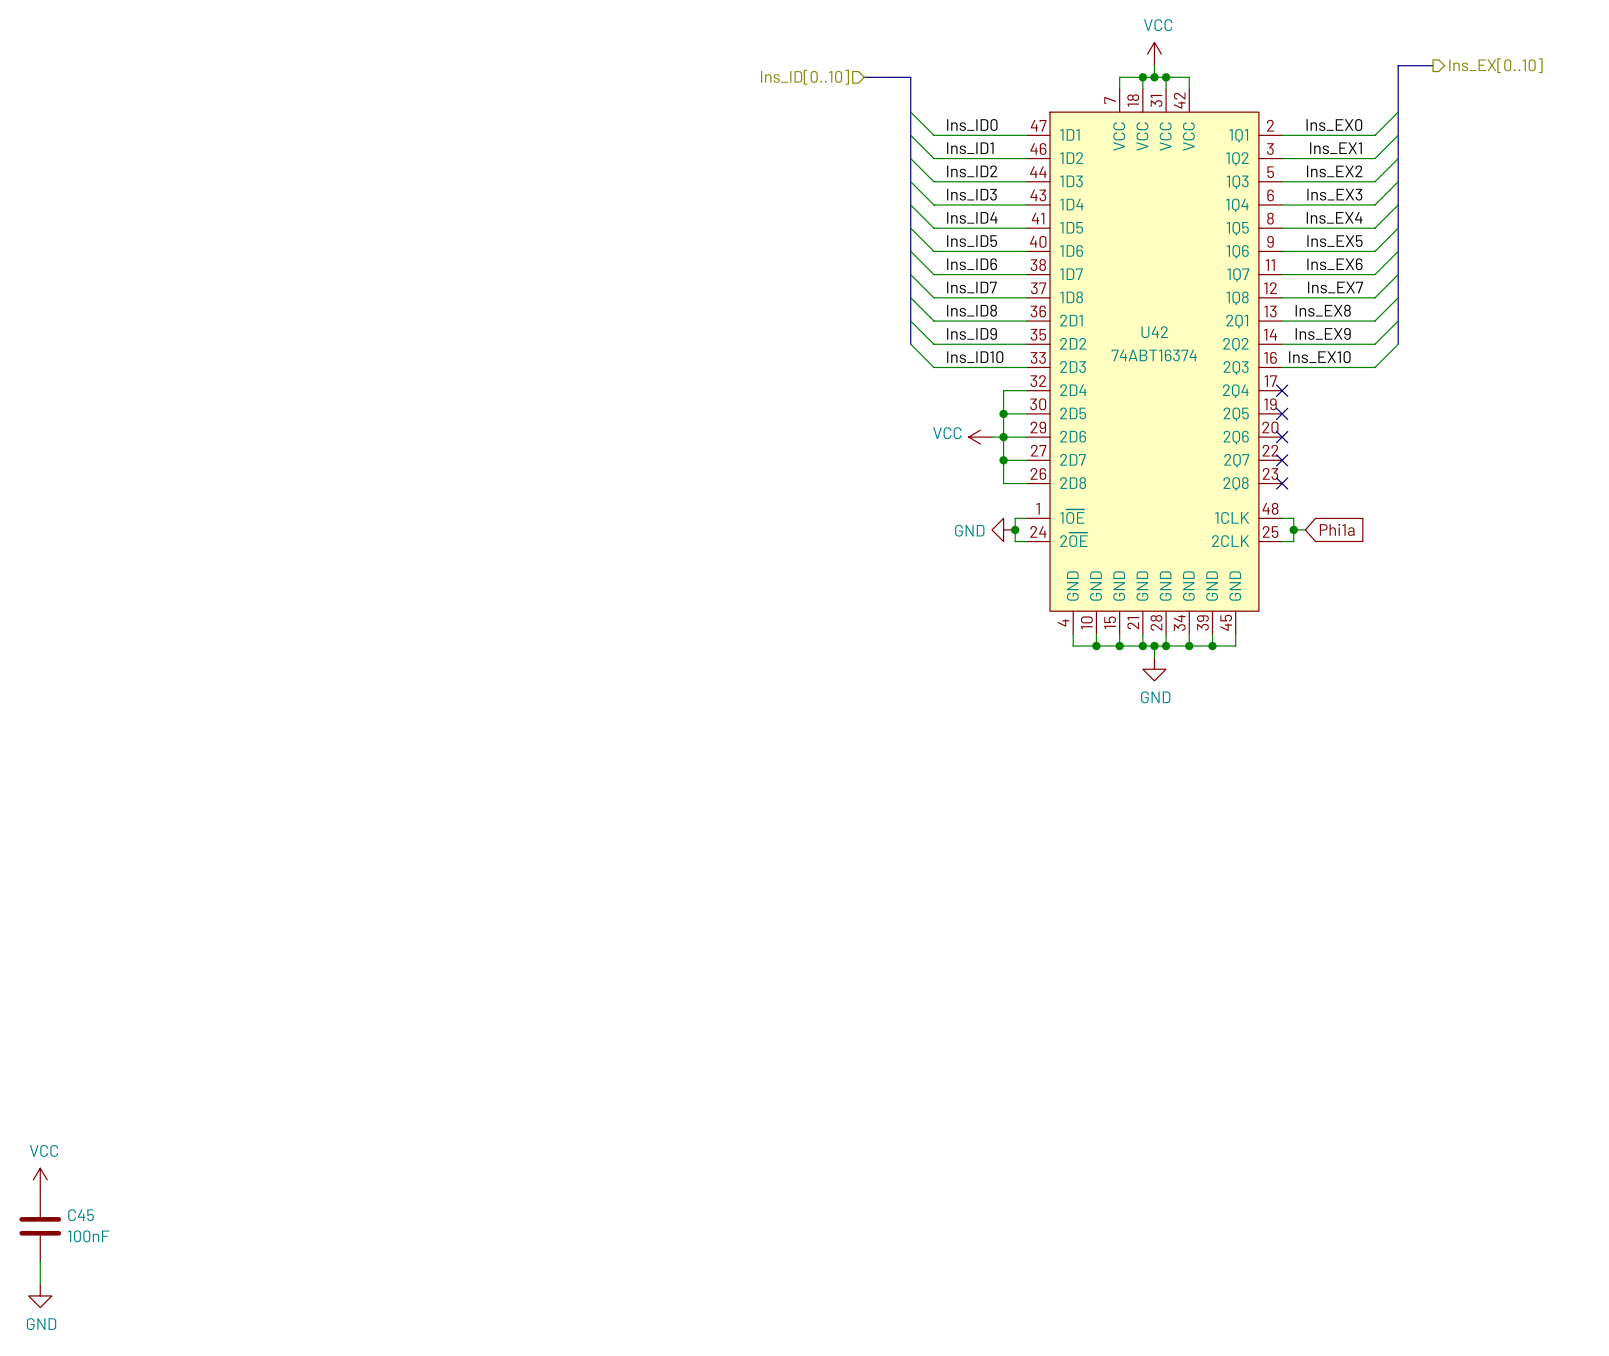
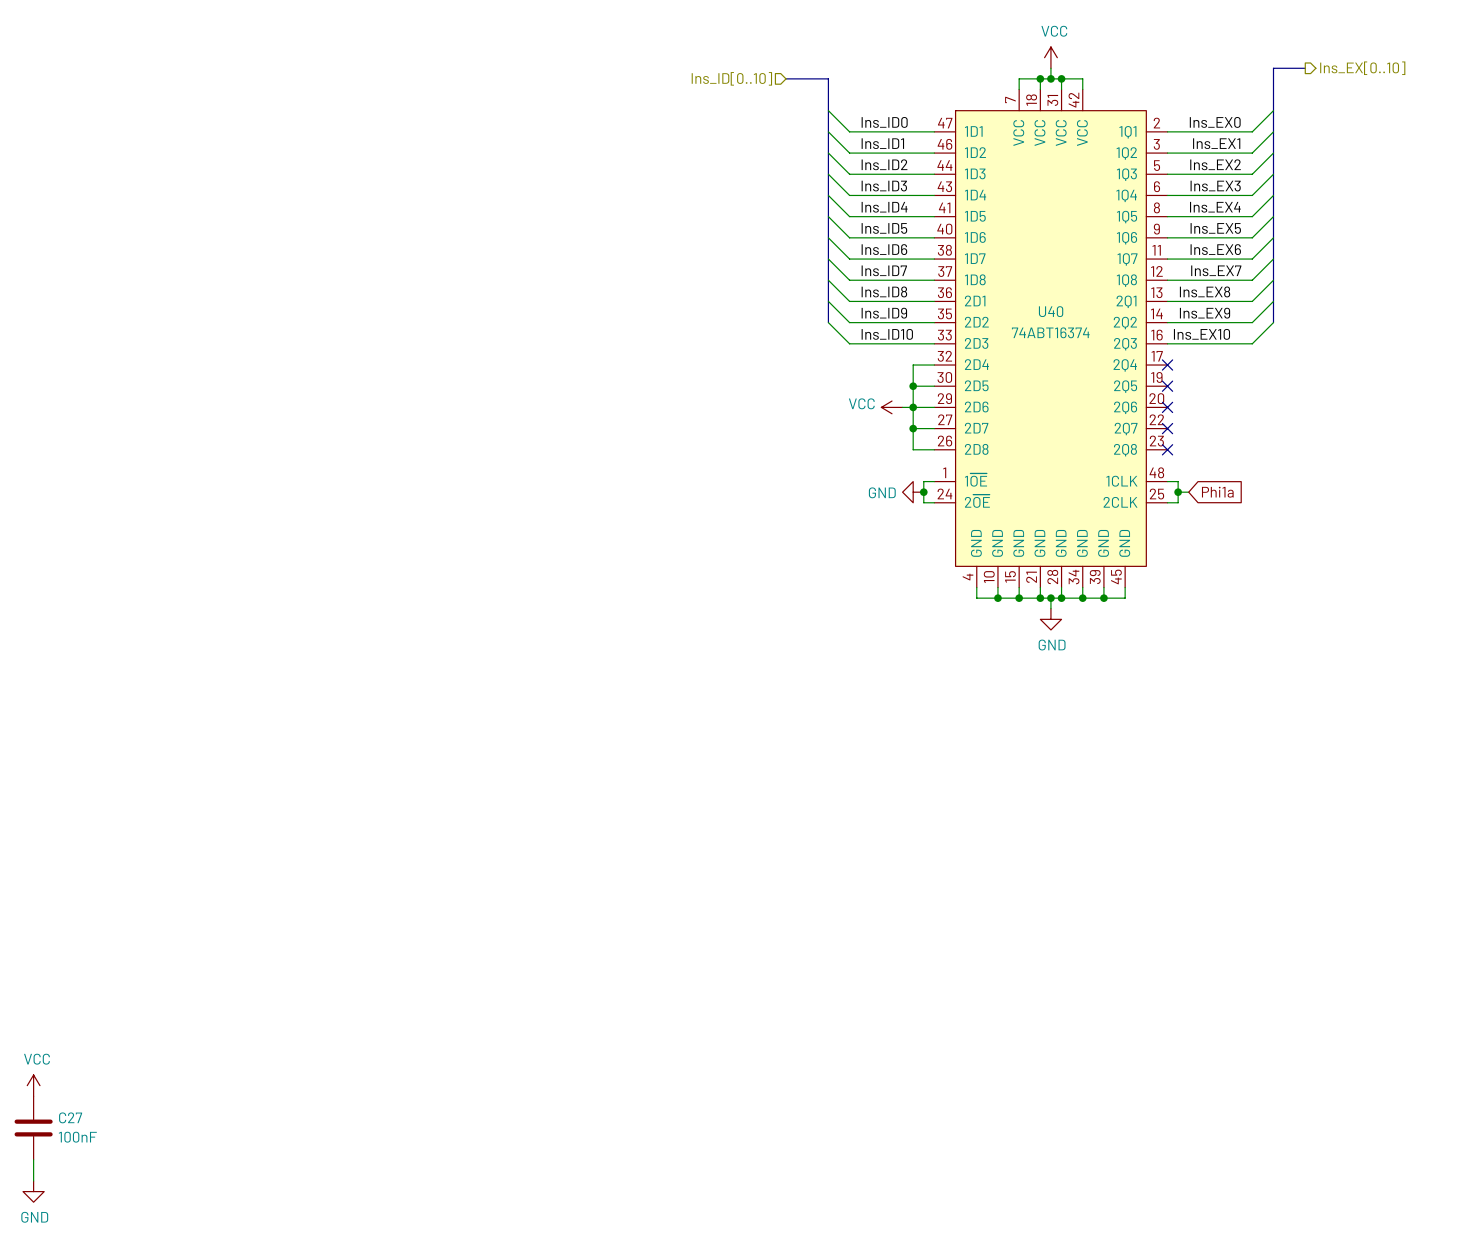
U42 name: U42 (1154, 332) -> U40 (1051, 311)
C45 name: C45 (81, 1215) -> C27 (70, 1117)

